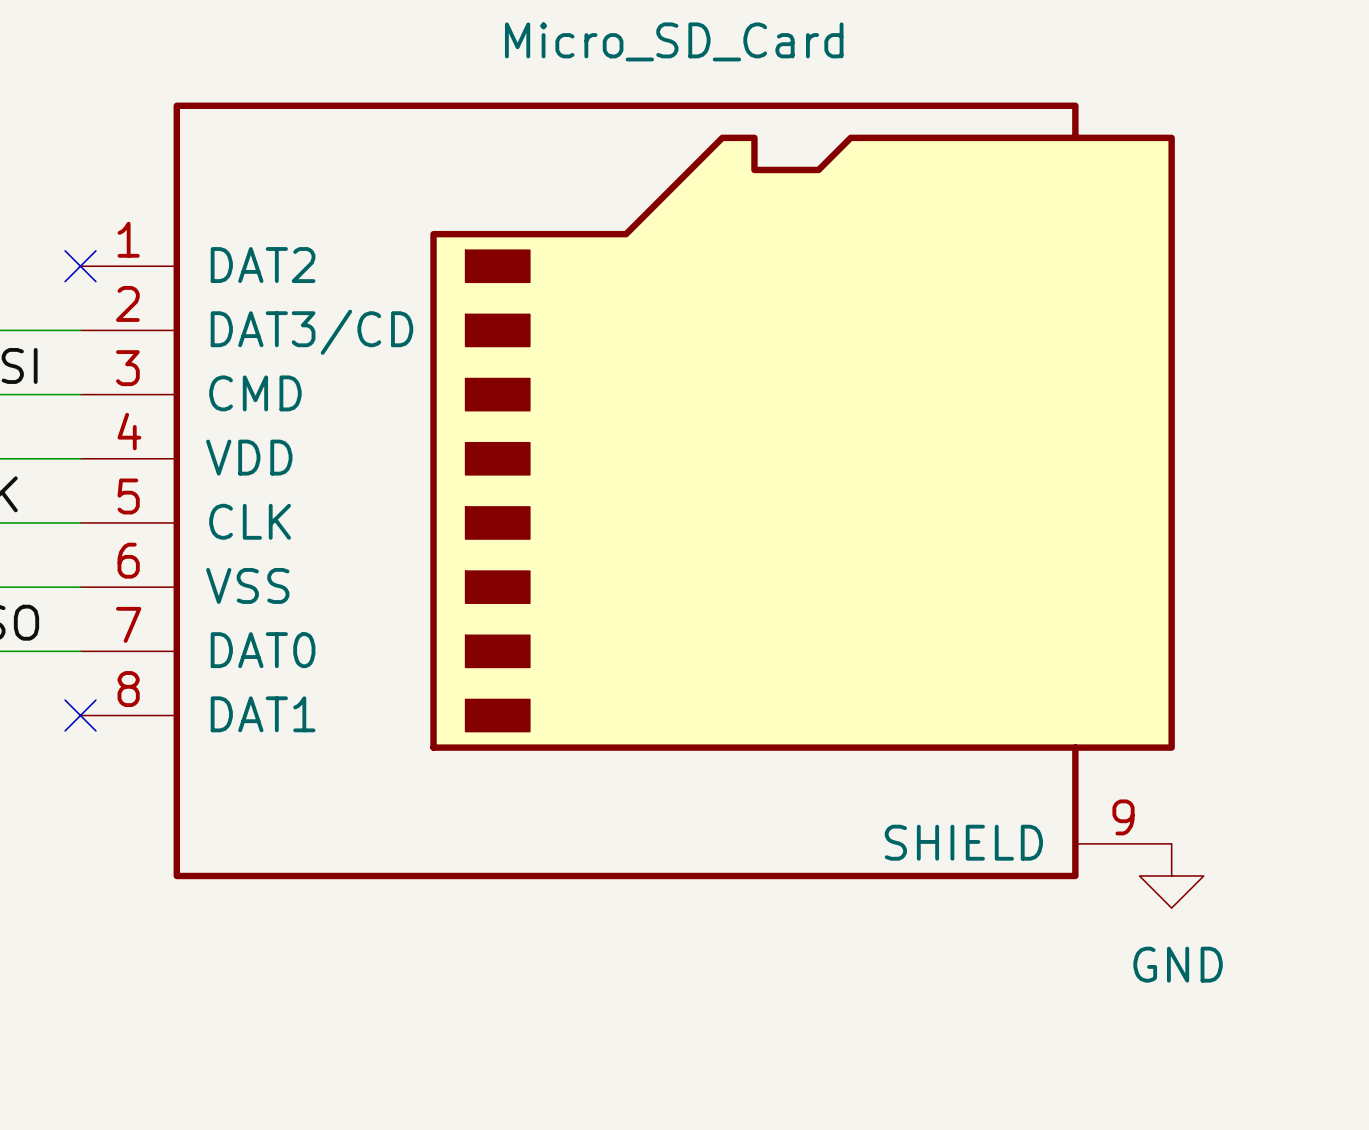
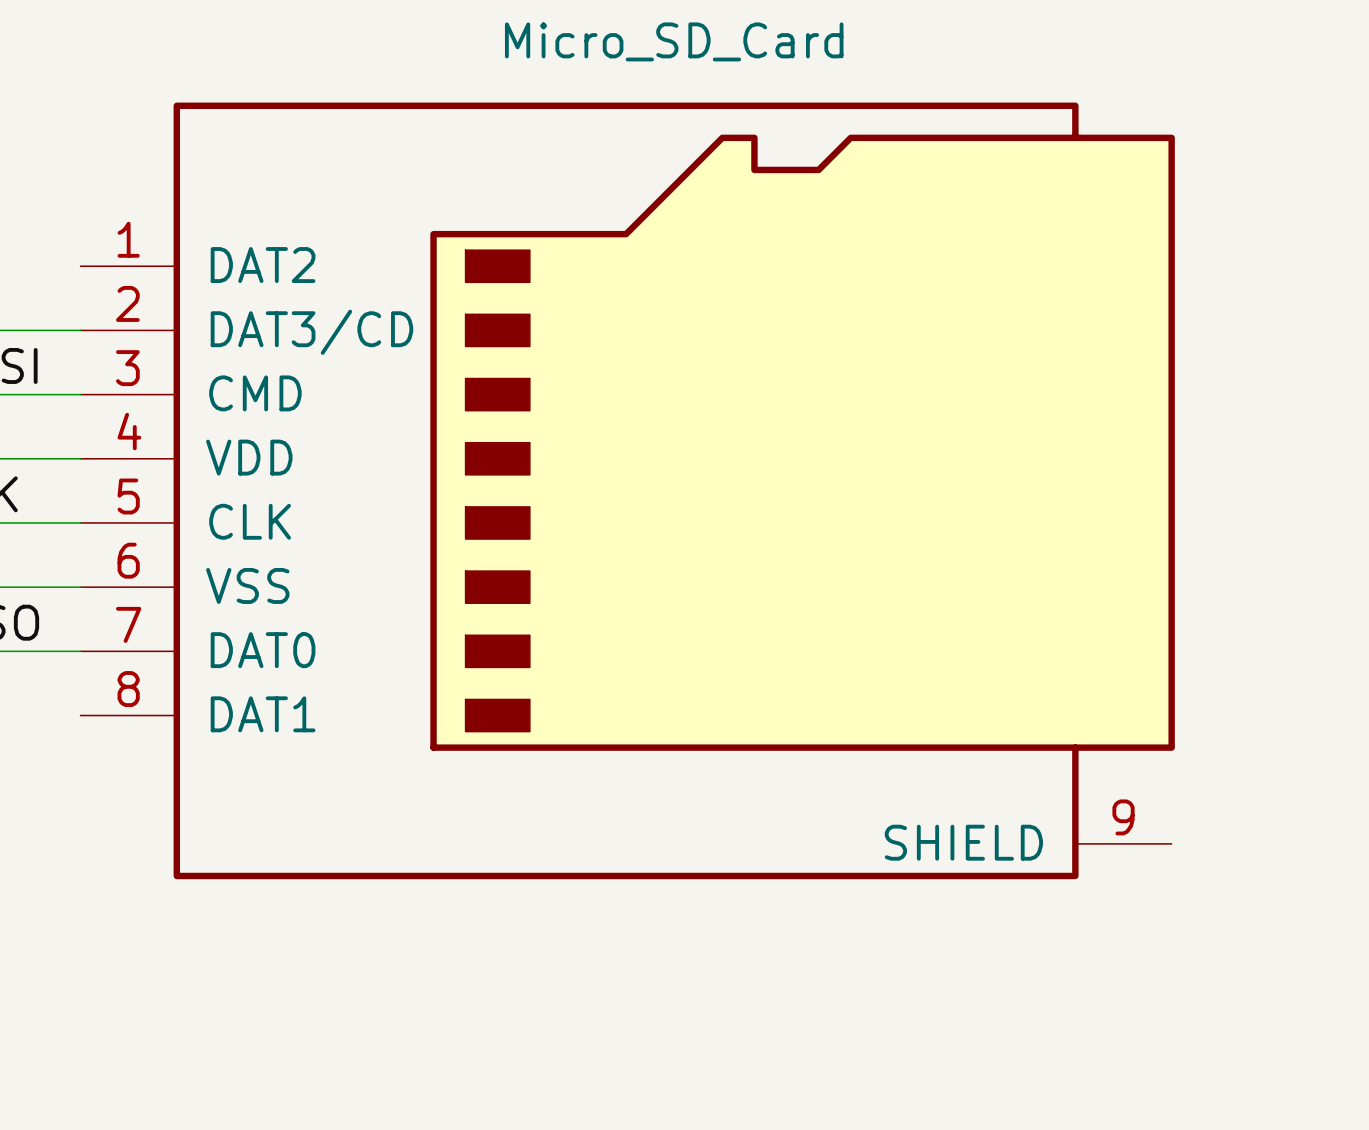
no-connect mark: (80, 266) -> none
no-connect mark: (80, 715) -> none
power symbol: GND (1171, 875) -> none

